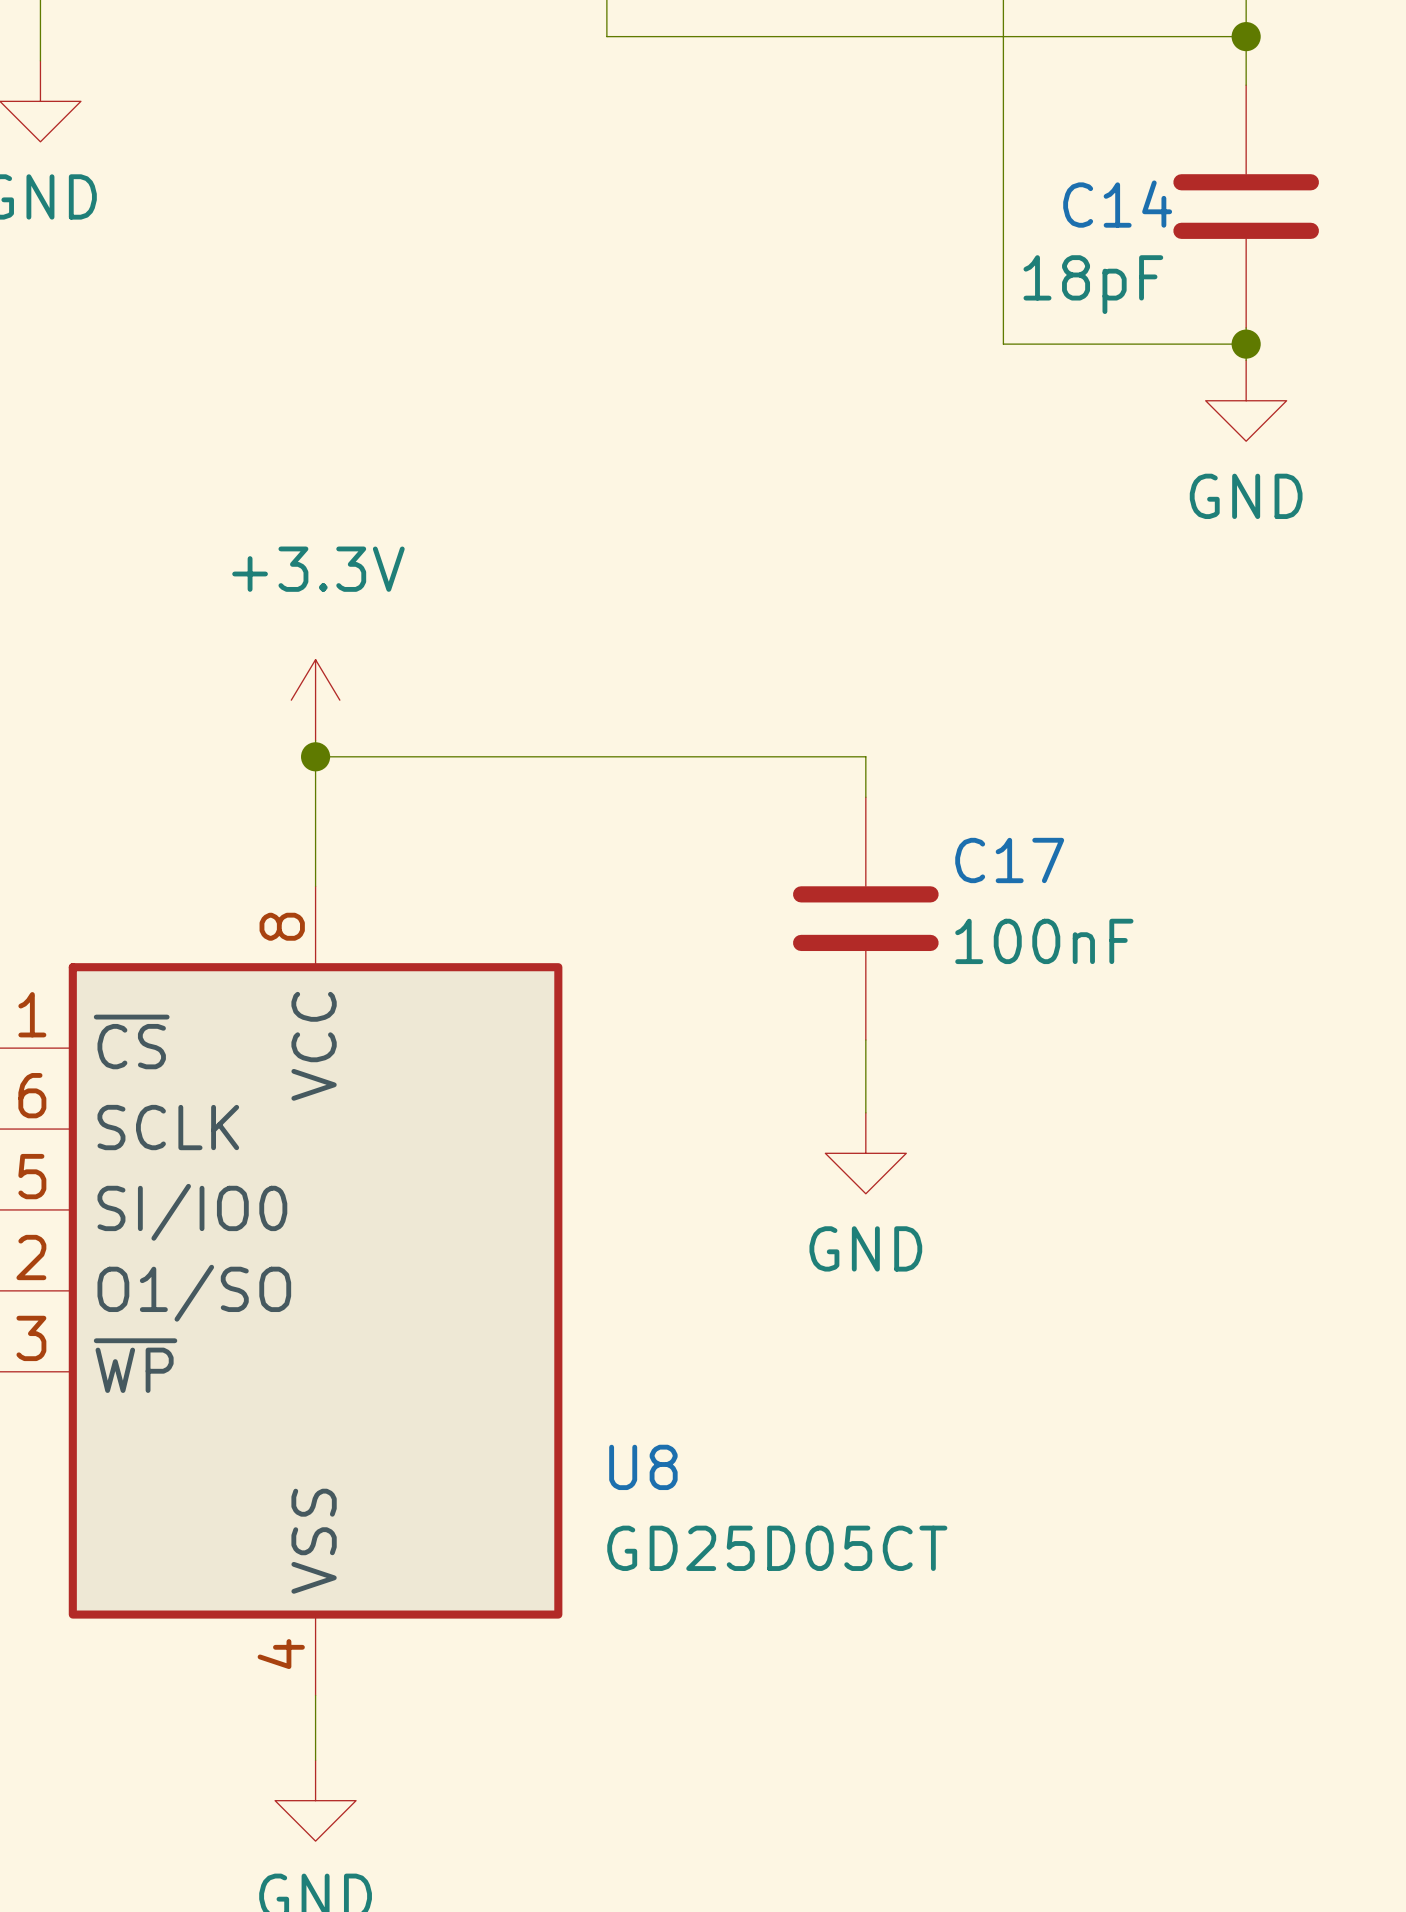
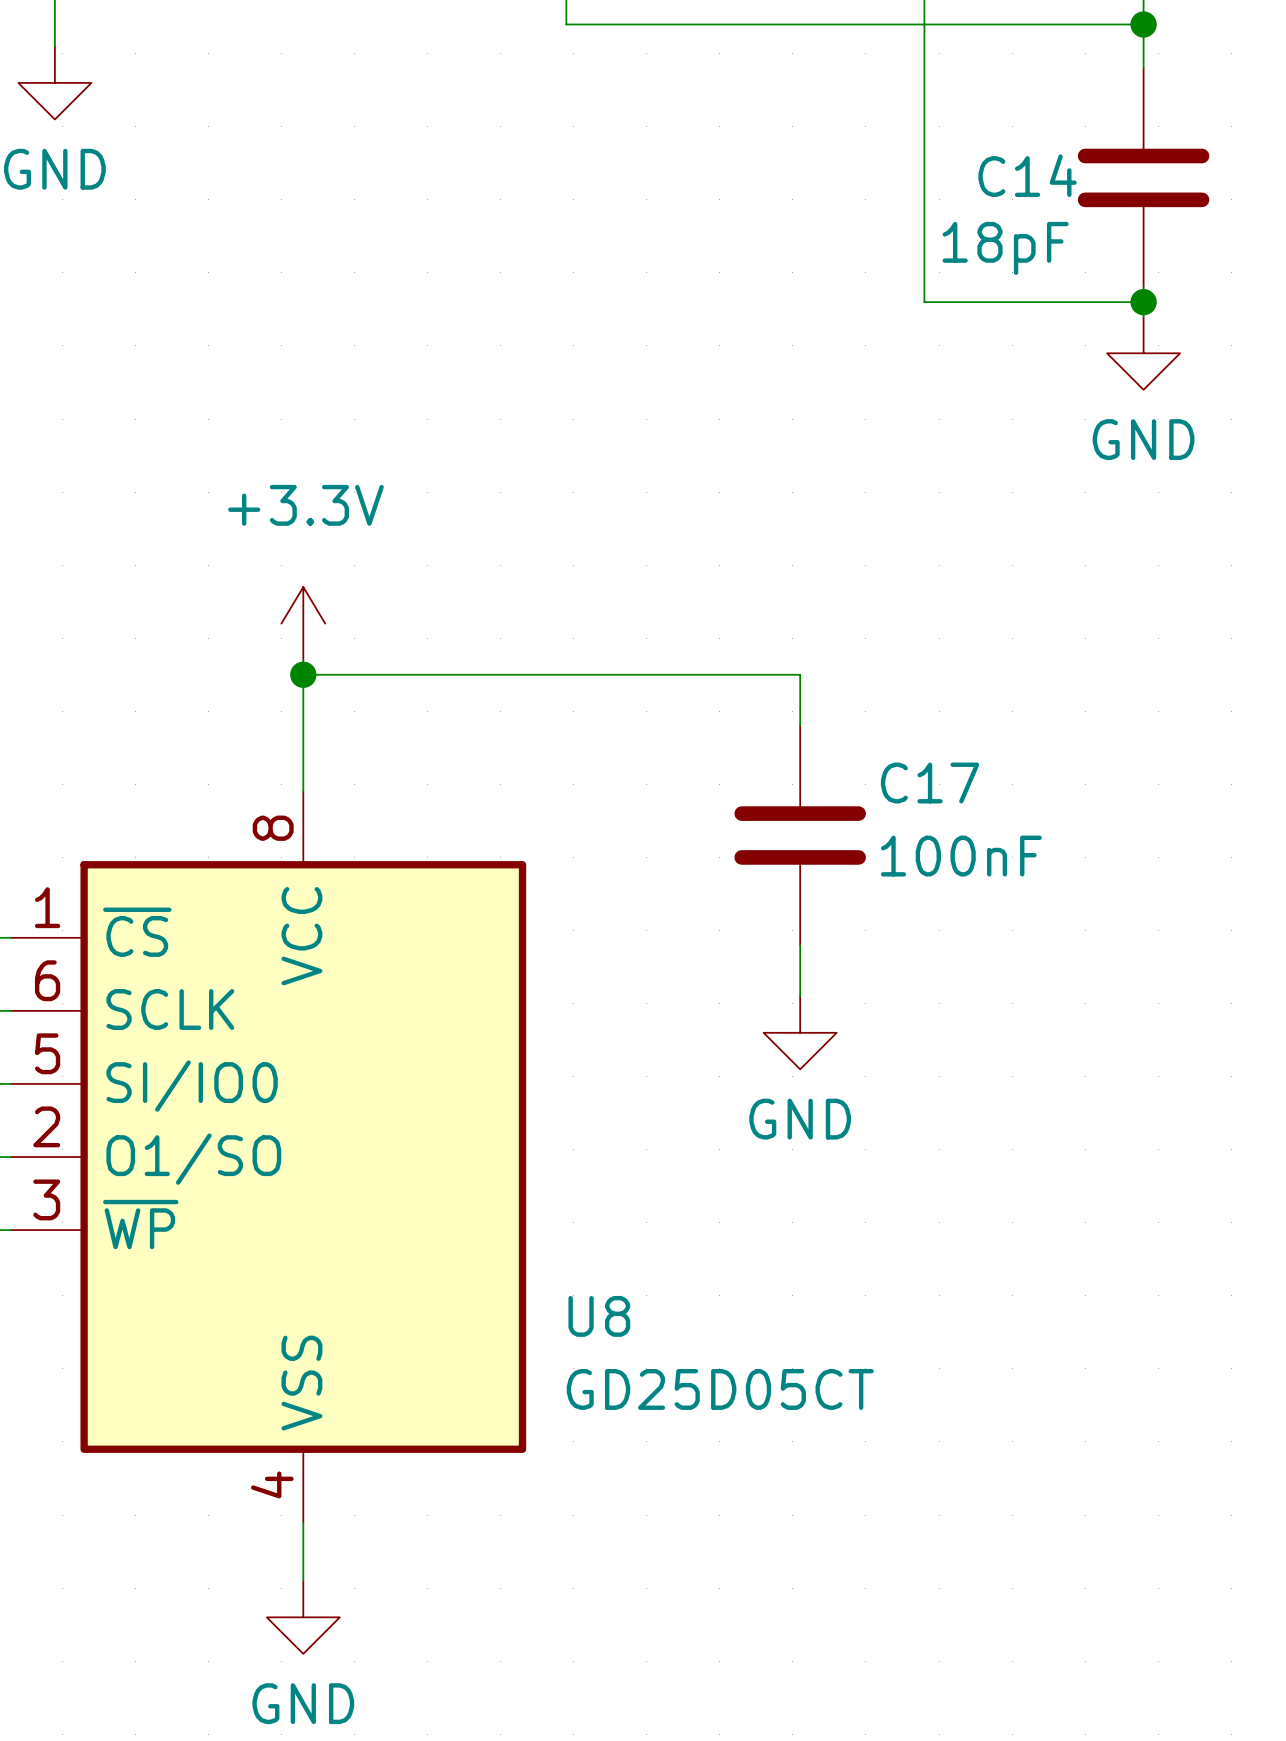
C17 position: (865, 918) -> (800, 835)

